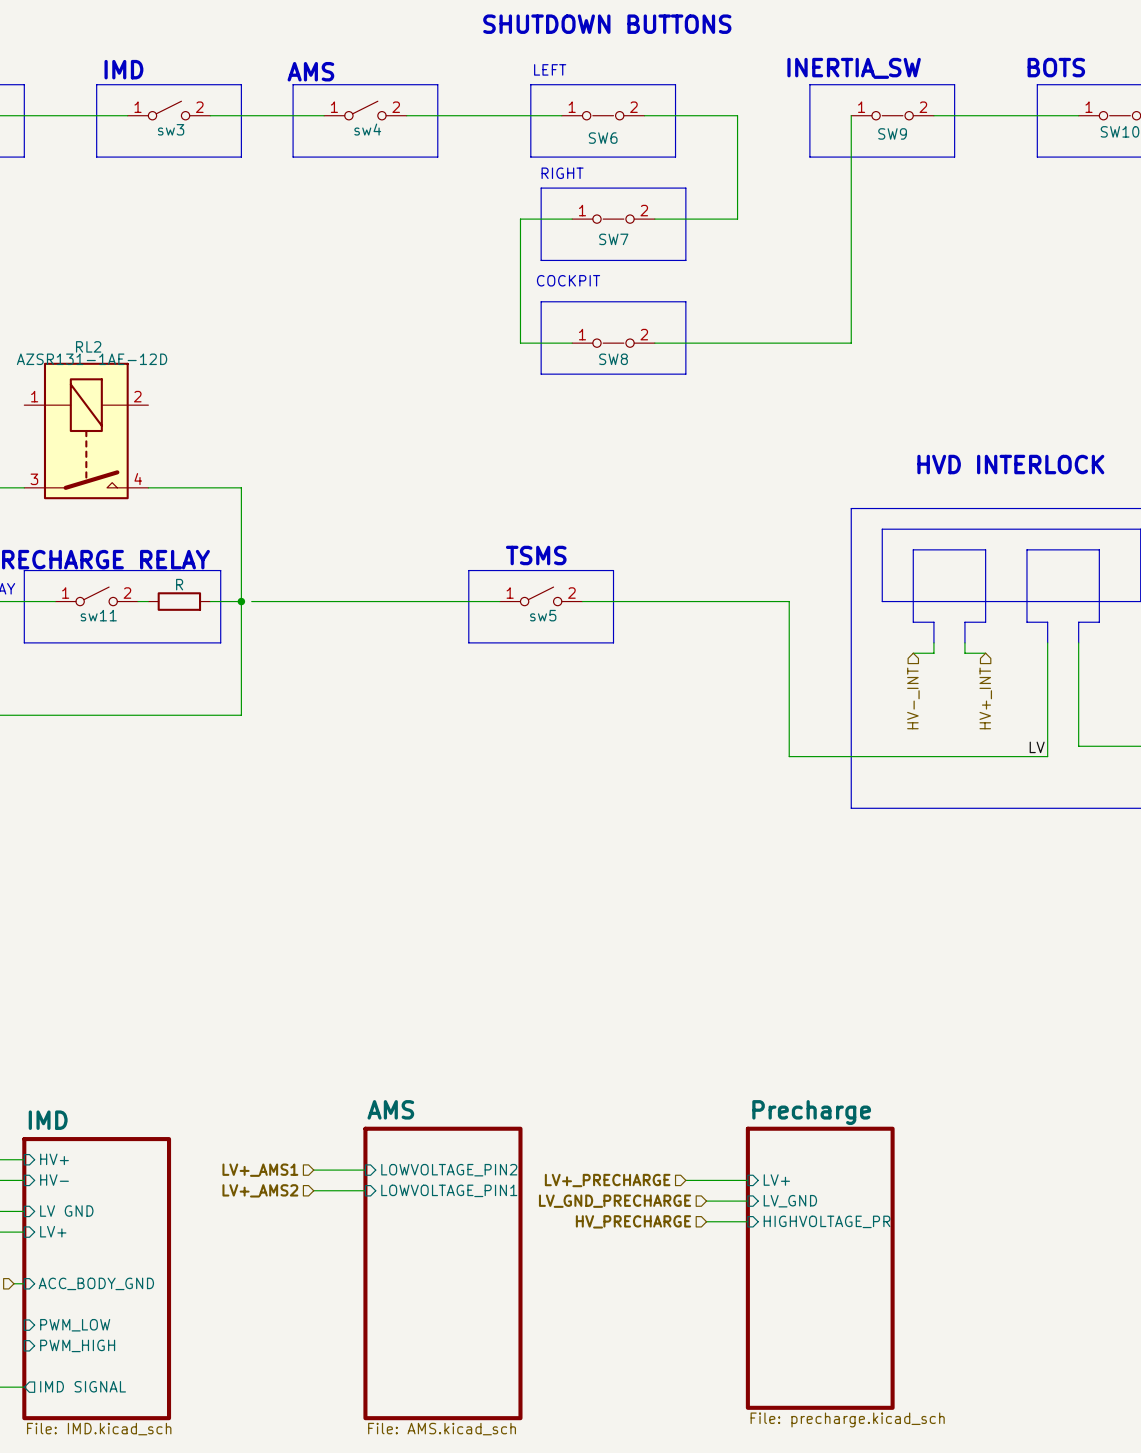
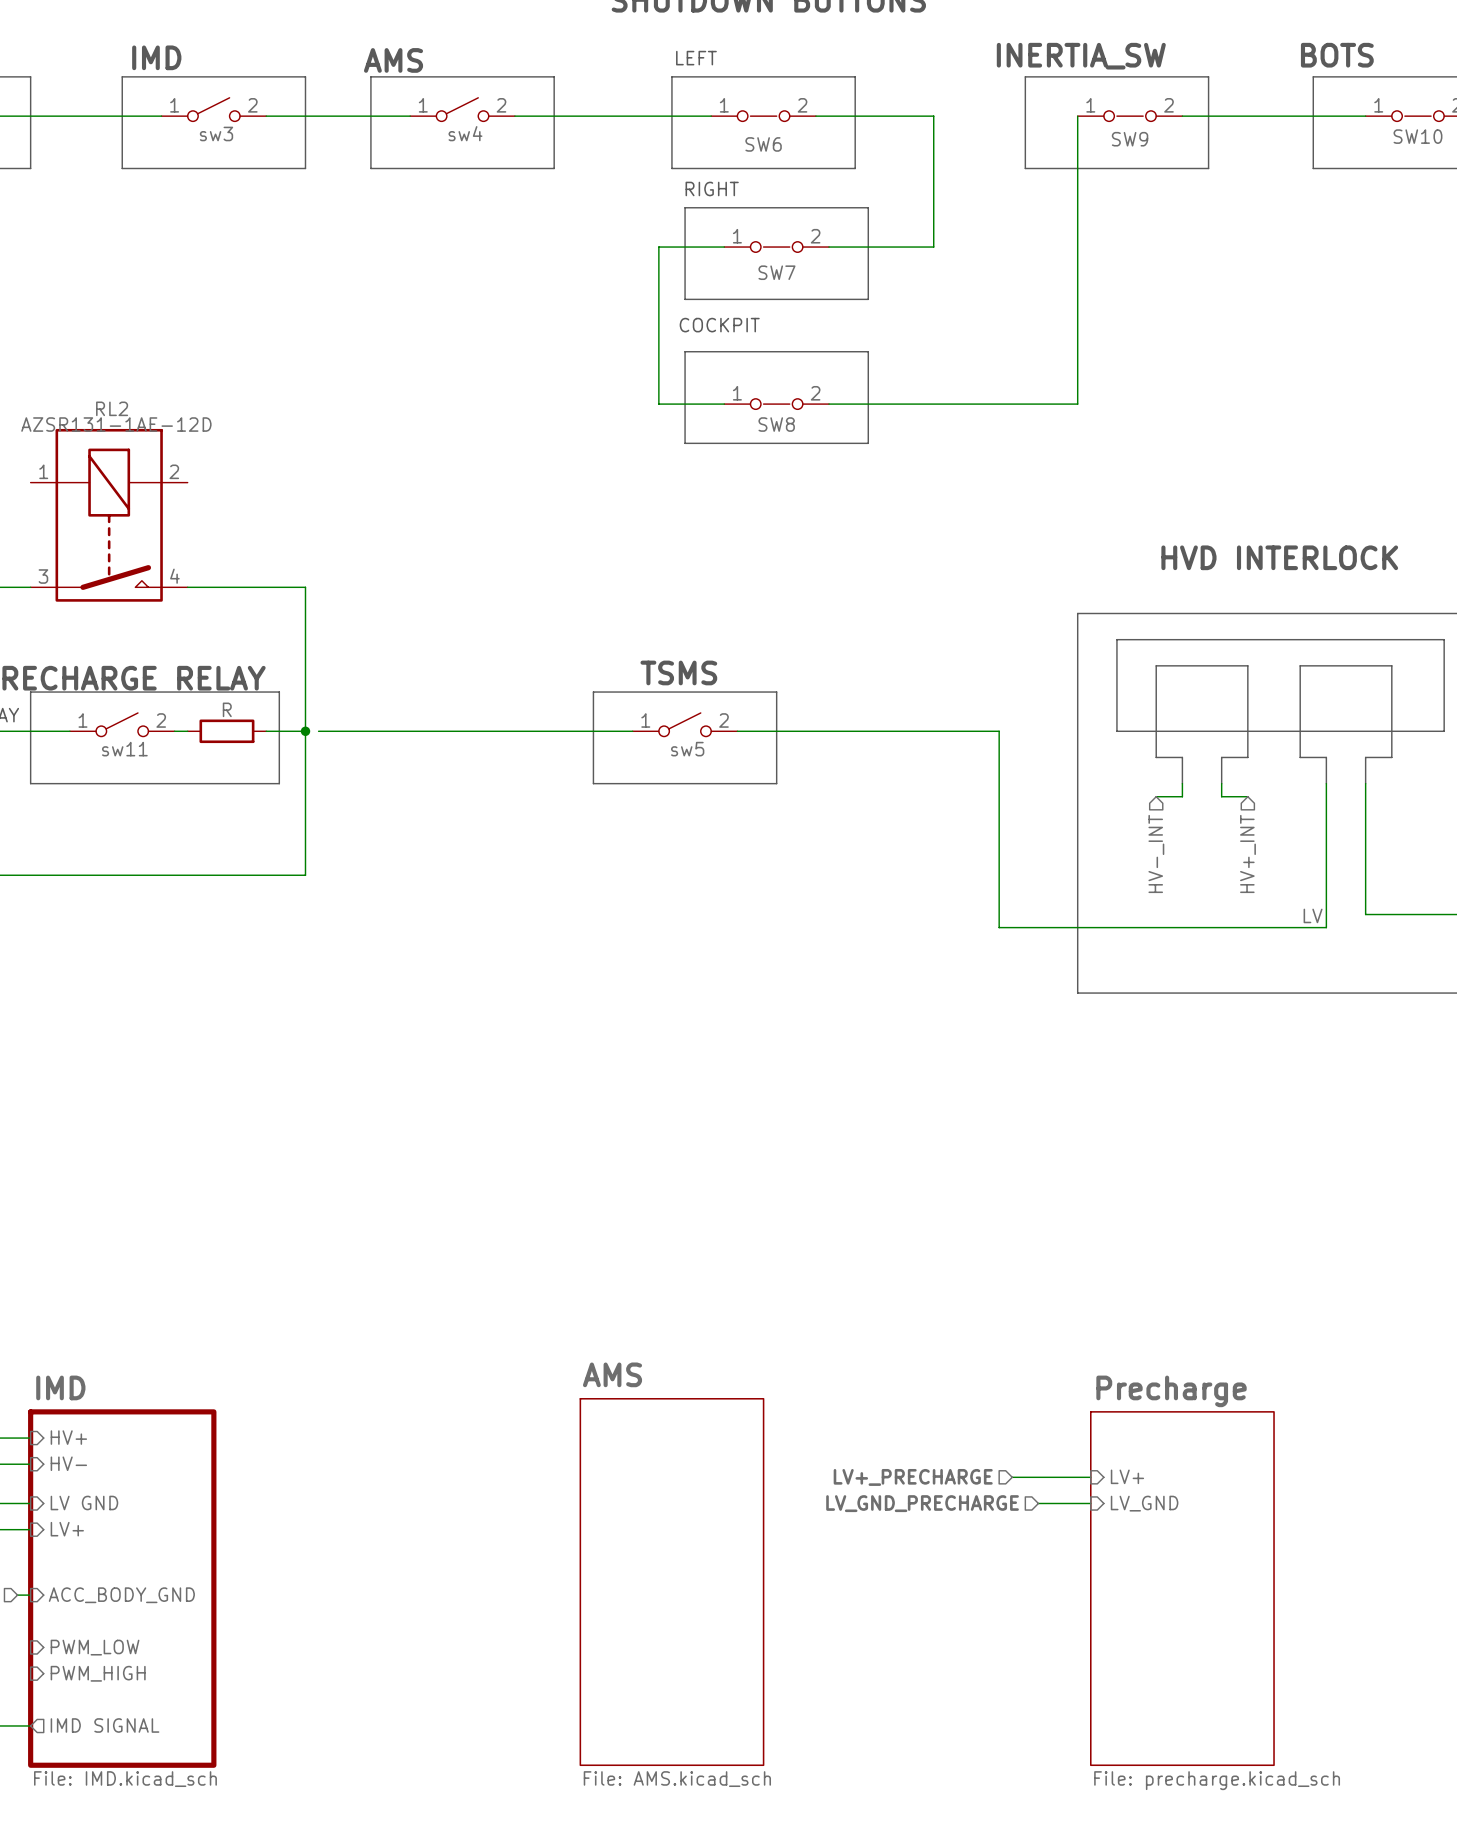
hierarchical label: LV+_AMS1 (260, 1170) -> none
wire: (313, 1170) (365, 1170) -> none
sheet pin: LOWVOLTAGE_PIN2 (449, 1170) -> none
hierarchical label position: LV+_PRECHARGE (607, 1180) -> LV+_PRECHARGE (913, 1477)
wire: (685, 1180) (747, 1180) -> (1012, 1477) (1090, 1477)
sheet pin position: LV+ (776, 1180) -> LV+ (1127, 1476)
hierarchical label: LV+_AMS2 (260, 1190) -> none
wire: (313, 1190) (365, 1190) -> none
sheet pin: LOWVOLTAGE_PIN1 (449, 1190) -> none
hierarchical label position: LV_GND_PRECHARGE (615, 1201) -> LV_GND_PRECHARGE (922, 1503)
wire: (706, 1201) (747, 1201) -> (1038, 1503) (1090, 1503)
sheet pin position: LV_GND (790, 1201) -> LV_GND (1144, 1503)
hierarchical label: HV_PRECHARGE (633, 1221) -> none
wire: (706, 1221) (747, 1221) -> none
sheet pin: HIGHVOLTAGE_PR (827, 1221) -> none
sheet Precharge: File: precharge.kicad_sch (820, 1268) -> none
sheet AMS: File: AMS.kicad_sch (442, 1273) -> none
sheet AMS: none -> File: AMS.kicad_sch (671, 1582)
sheet Precharge: none -> File: precharge.kicad_sch (1182, 1588)

